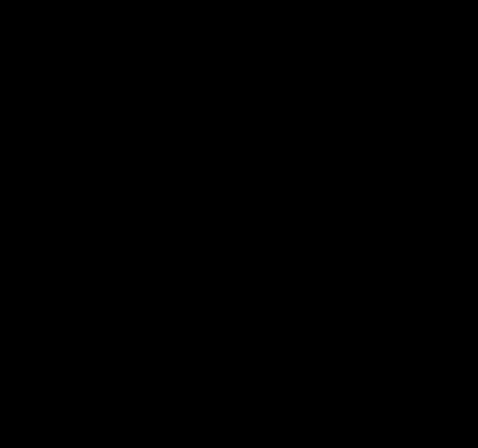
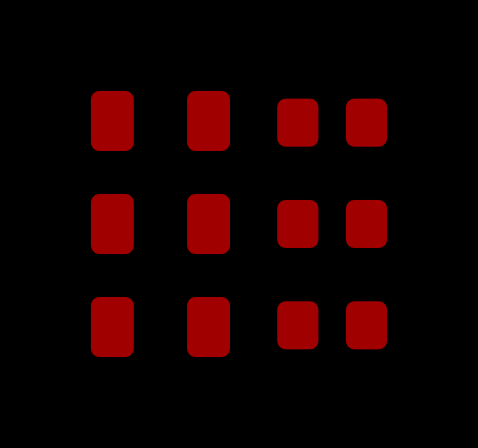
part: none -> (160, 120)
part: none -> (332, 122)
part: none -> (160, 223)
part: none -> (332, 223)
part: none -> (332, 325)
part: none -> (160, 327)

